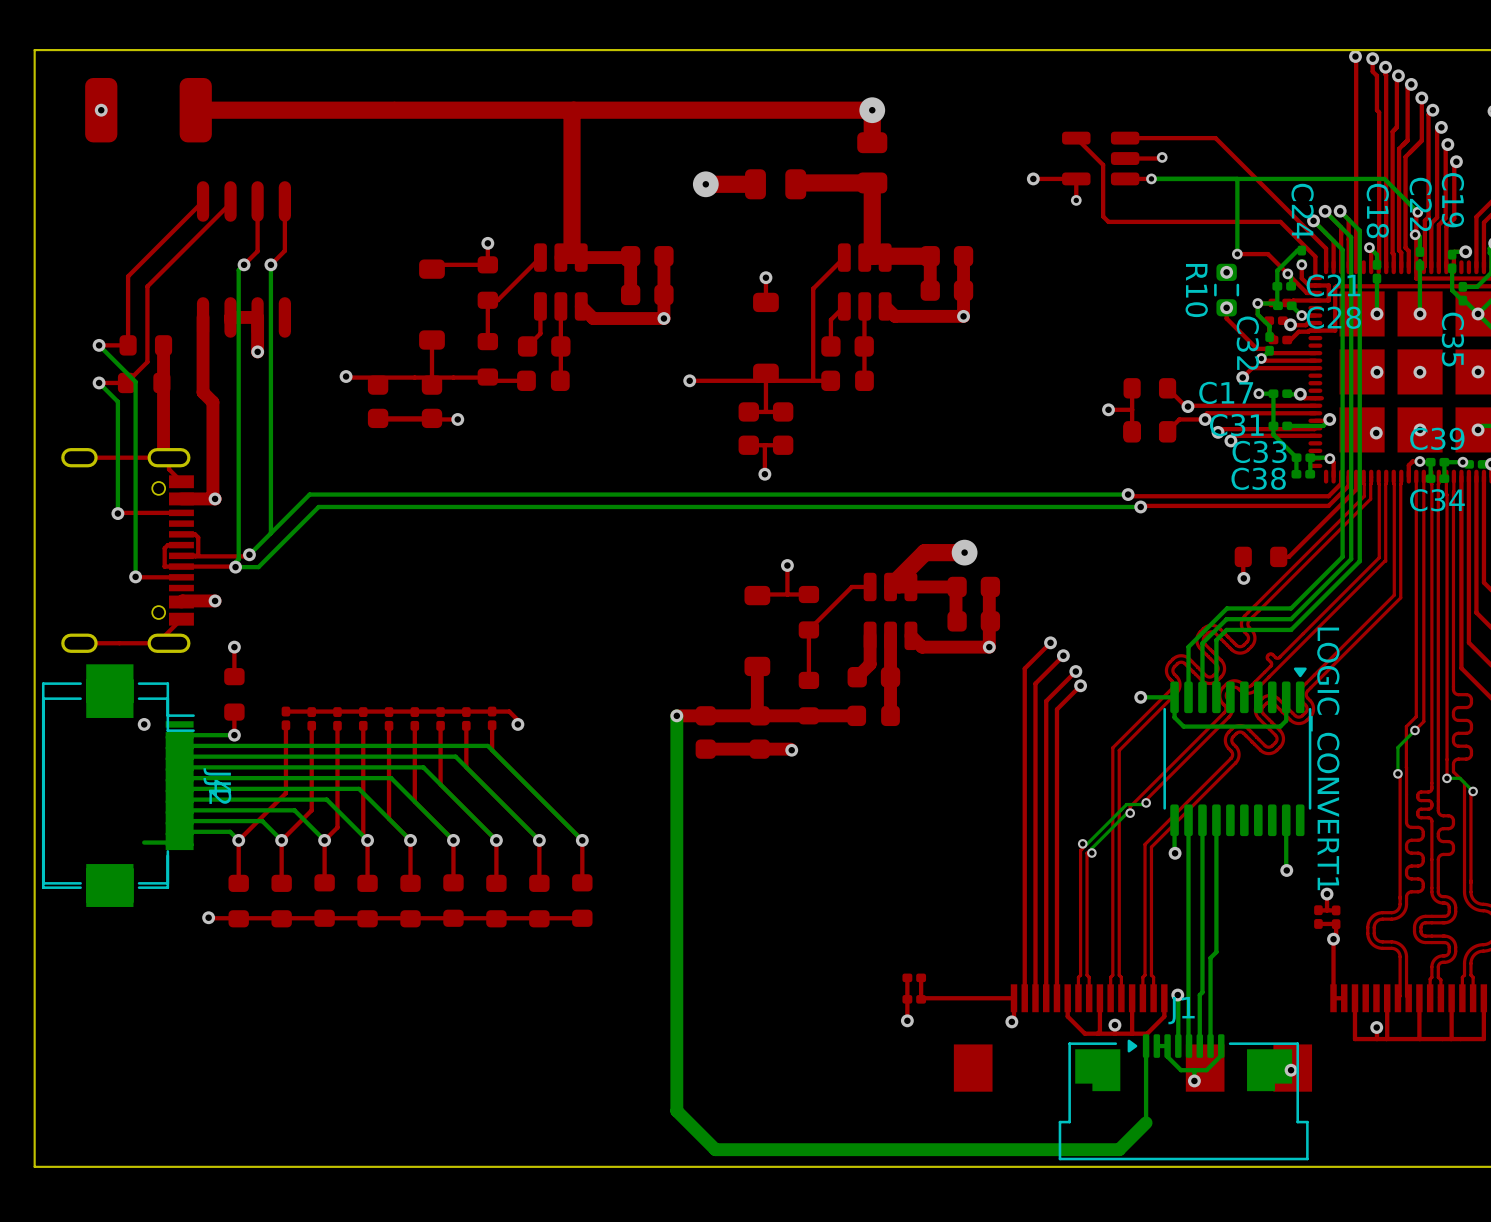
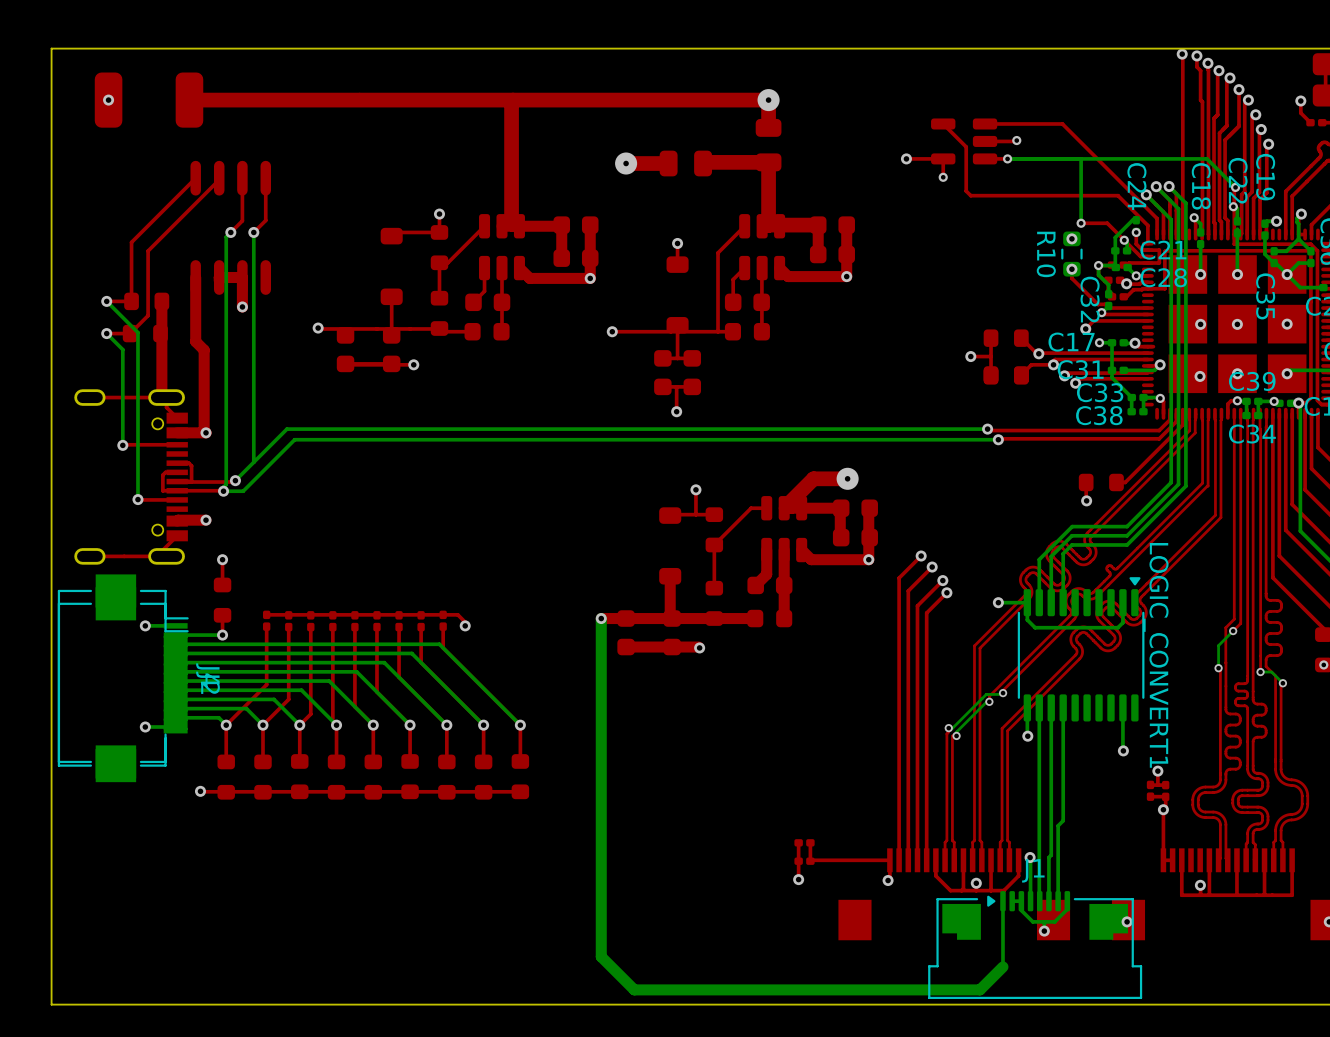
bottom track: none -> (175, 625) (145, 625)
via: none -> (145, 727)

